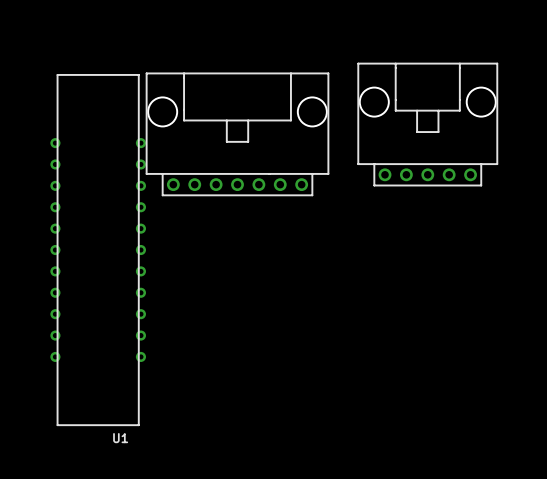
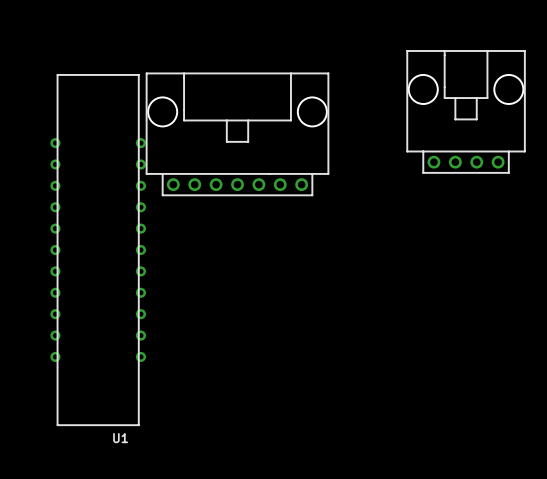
part: none -> (466, 111)
part: (427, 124) -> none

